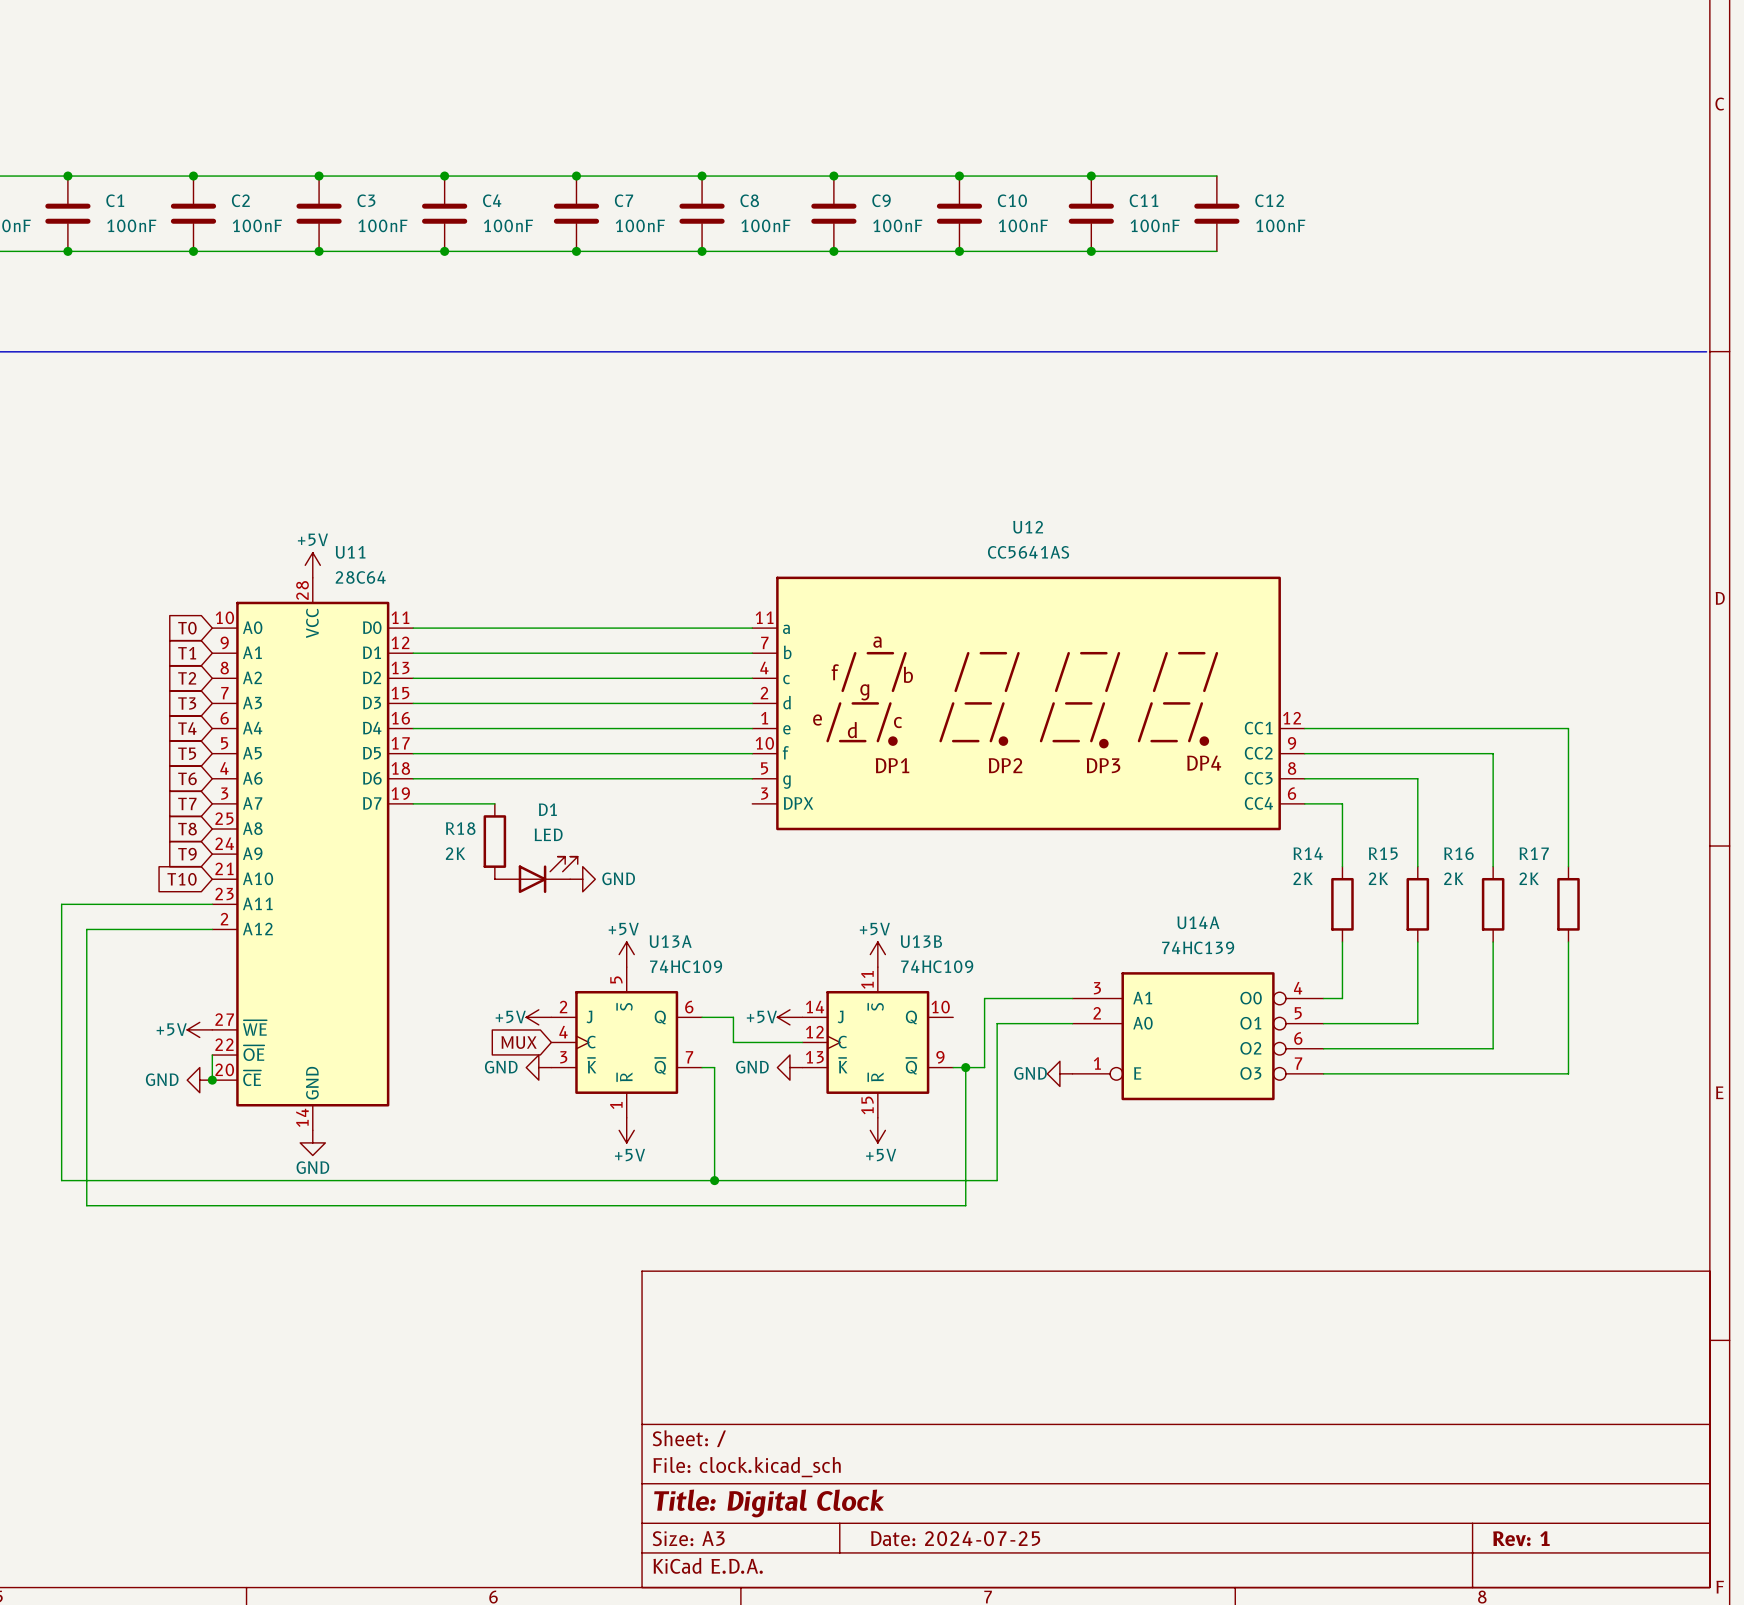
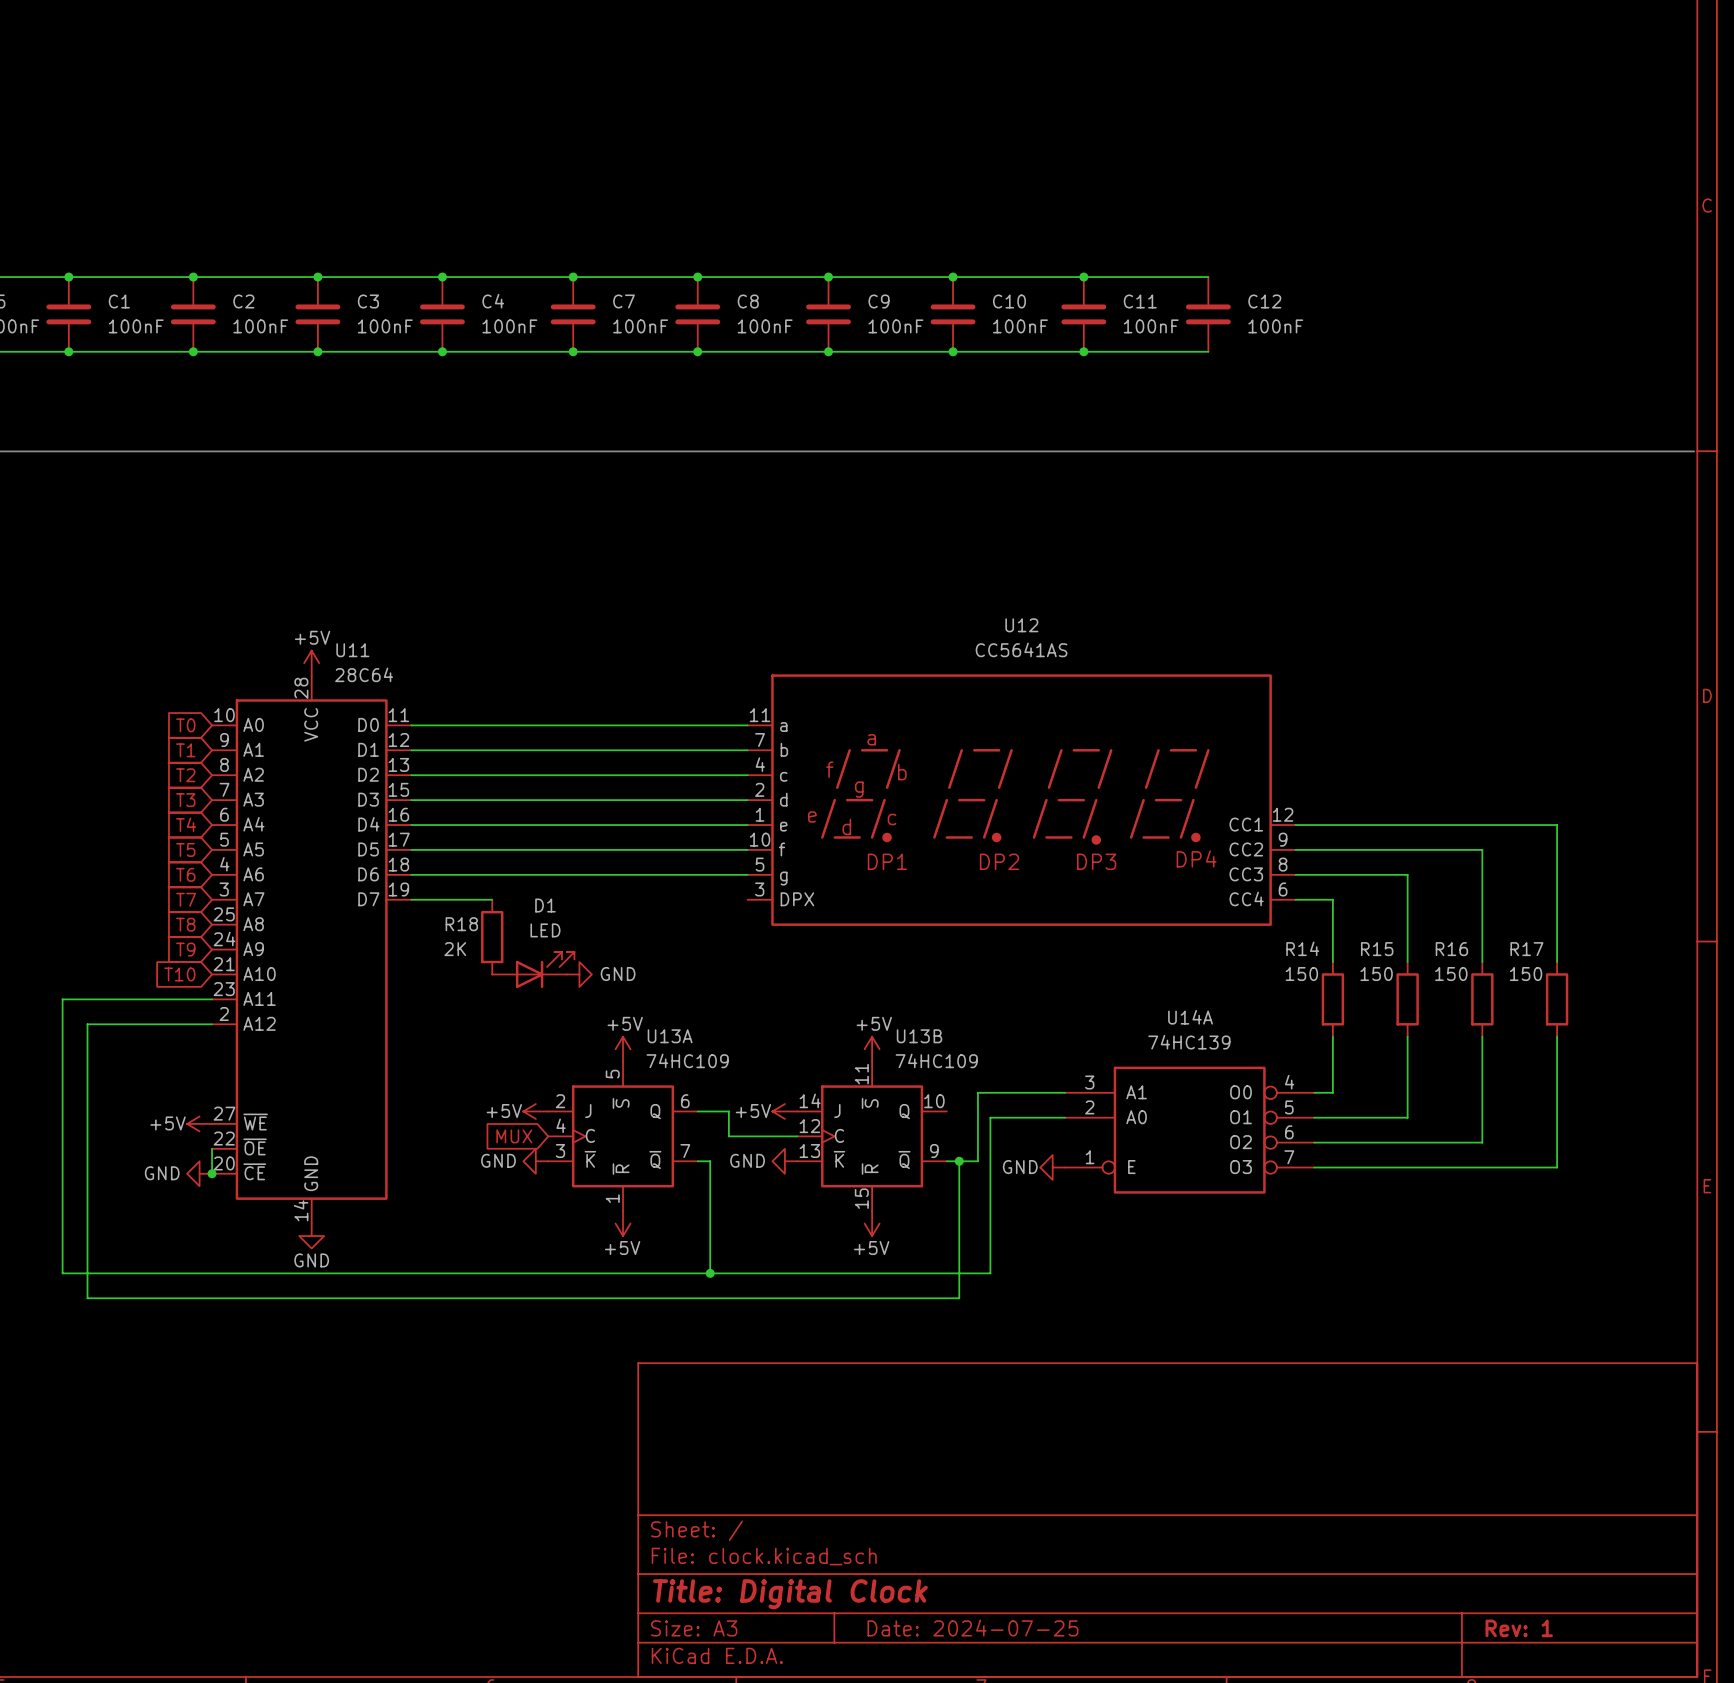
R14 value: 2K (1303, 878) -> 150 (1301, 974)
R15 value: 2K (1378, 878) -> 150 (1376, 974)
R16 value: 2K (1453, 878) -> 150 (1451, 974)
R17 value: 2K (1529, 878) -> 150 (1526, 974)

